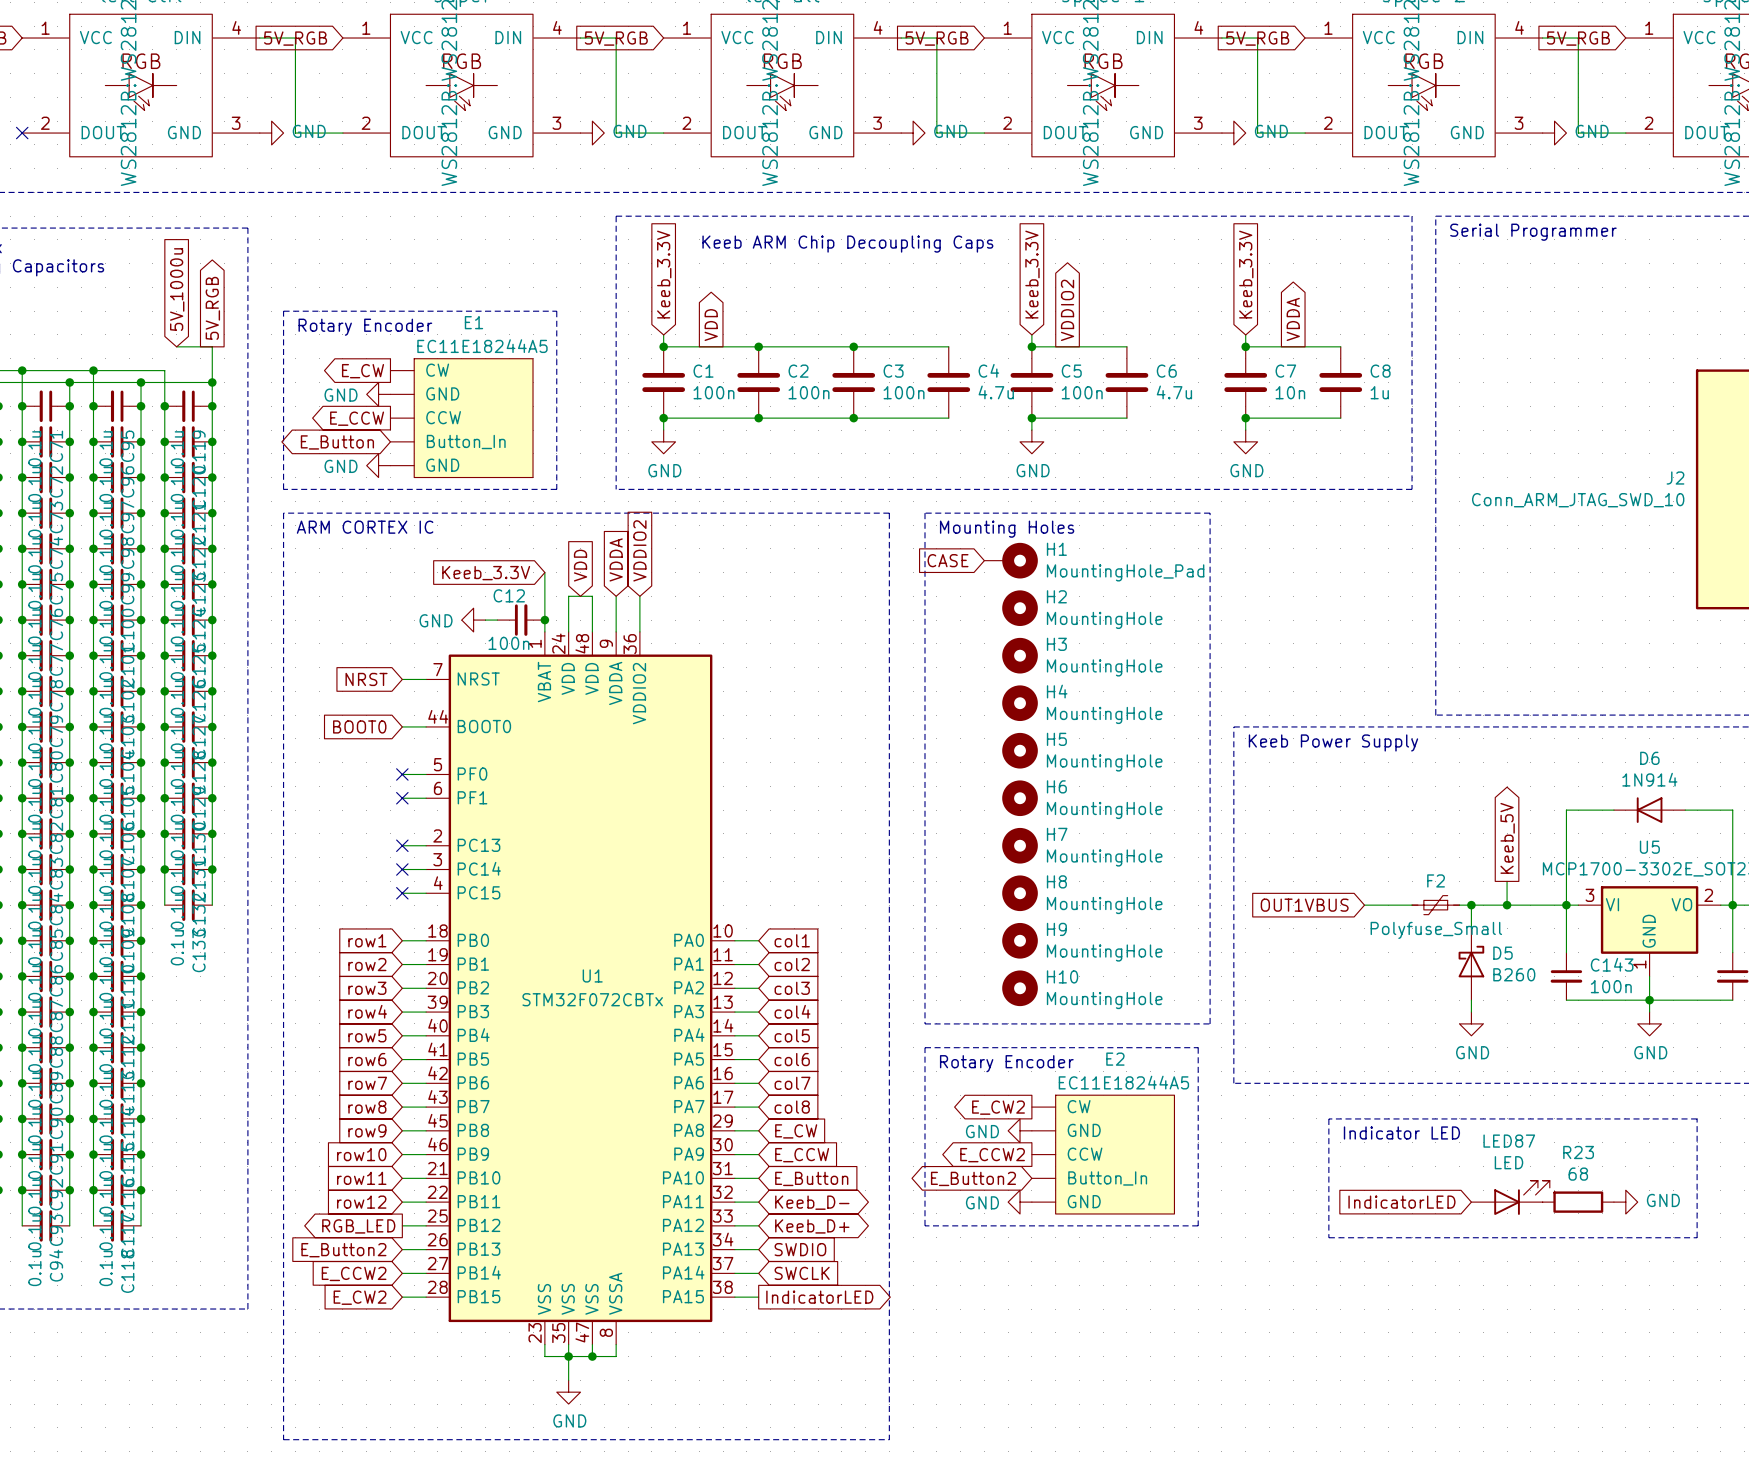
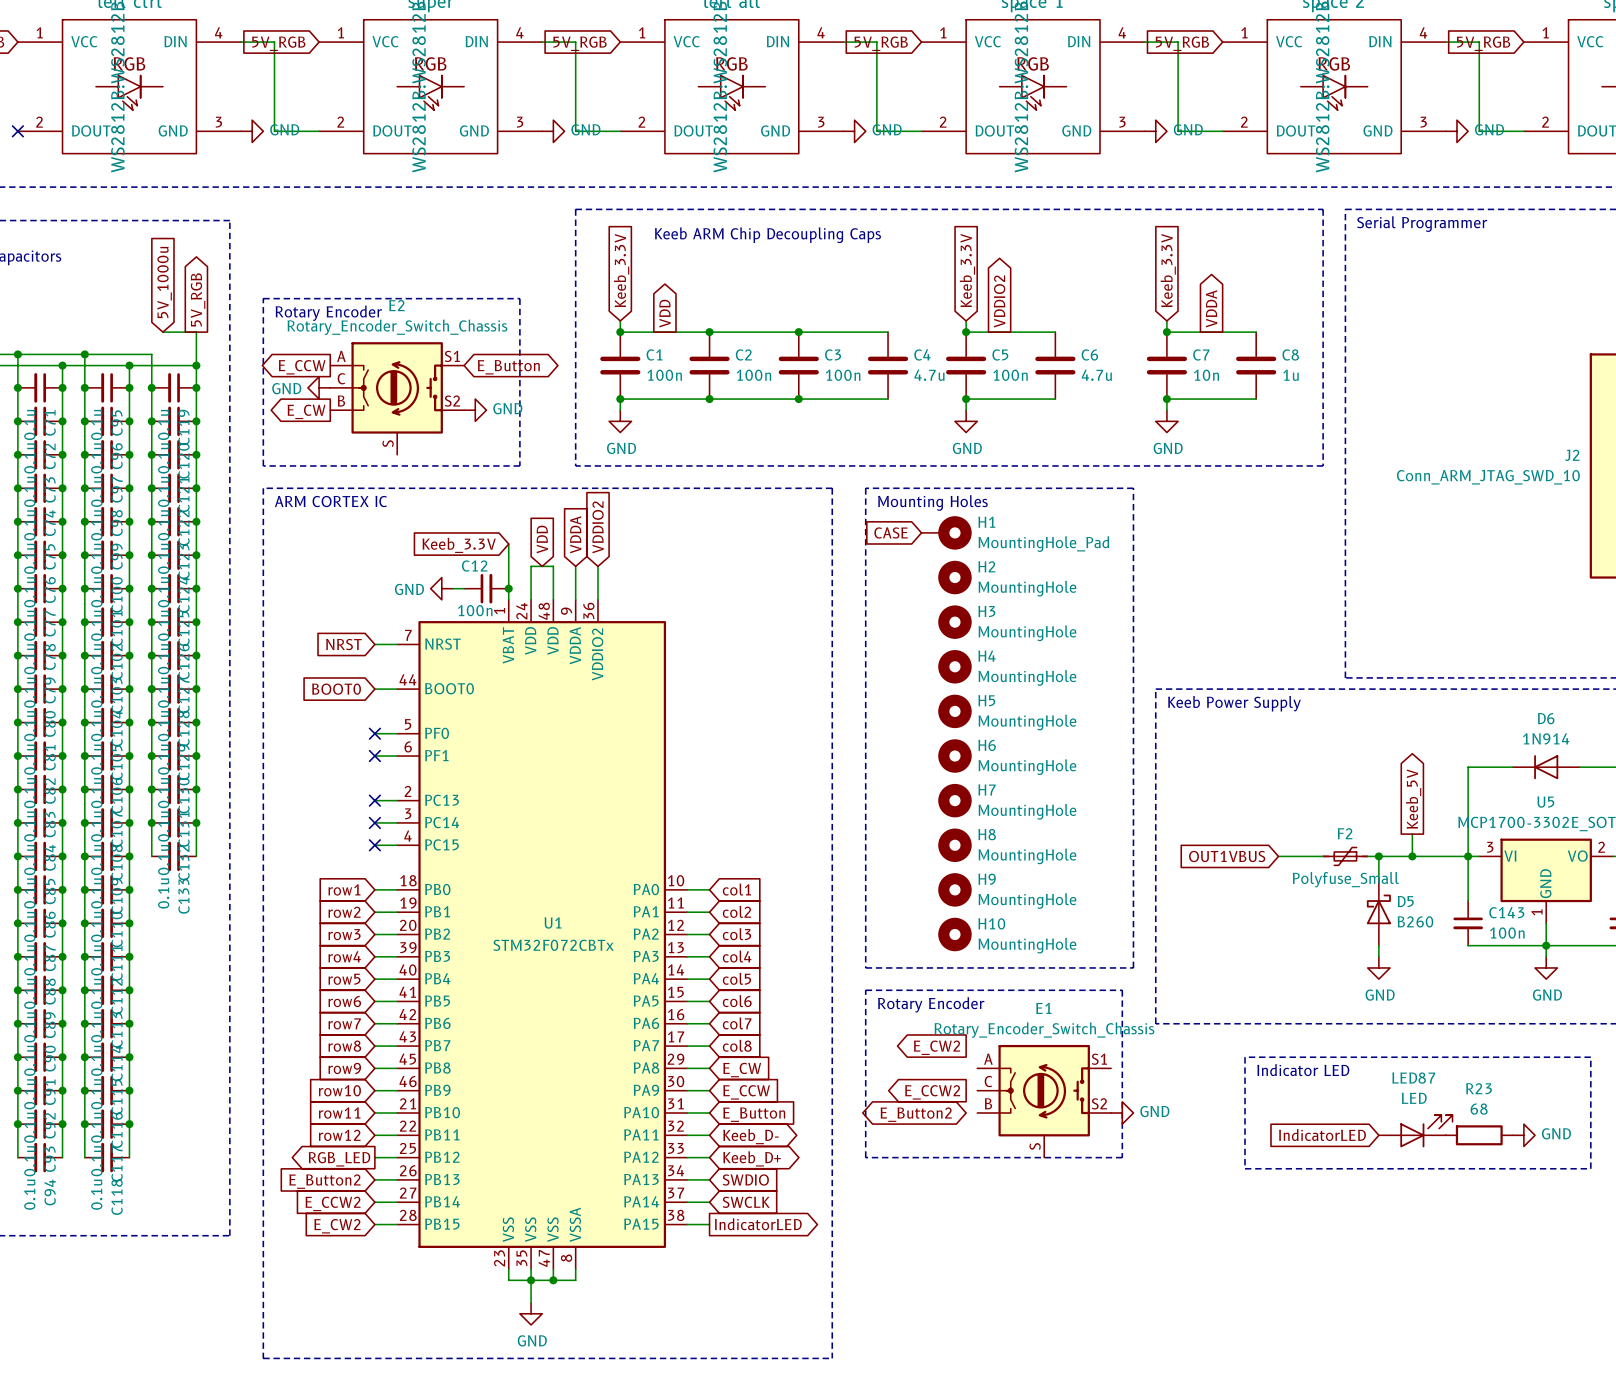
E1 value: EC11E18244A5 (482, 346) -> Rotary_Encoder_Switch_Chassis (1044, 1030)
E1 symbol: [390, 358, 534, 478] -> [977, 1044, 1112, 1158]
global label position: E_CW (363, 371) -> E_CW (306, 411)
power symbol: GND (378, 394) -> none
power symbol: none -> GND (319, 387)
global label position: E_CCW (357, 418) -> E_CCW (302, 367)
power symbol: none -> GND (475, 410)
global label rotation: 0° (337, 442) -> 180° (508, 367)
global label position: E_Button (337, 442) -> E_Button (508, 367)
power symbol: GND (378, 465) -> none
E2 value: EC11E18244A5 (1123, 1082) -> Rotary_Encoder_Switch_Chassis (397, 327)
E2 symbol: [1031, 1095, 1175, 1214] -> [330, 342, 465, 455]
power symbol: GND (1020, 1130) -> none
power symbol: none -> GND (1122, 1113)
power symbol: GND (1020, 1202) -> none

